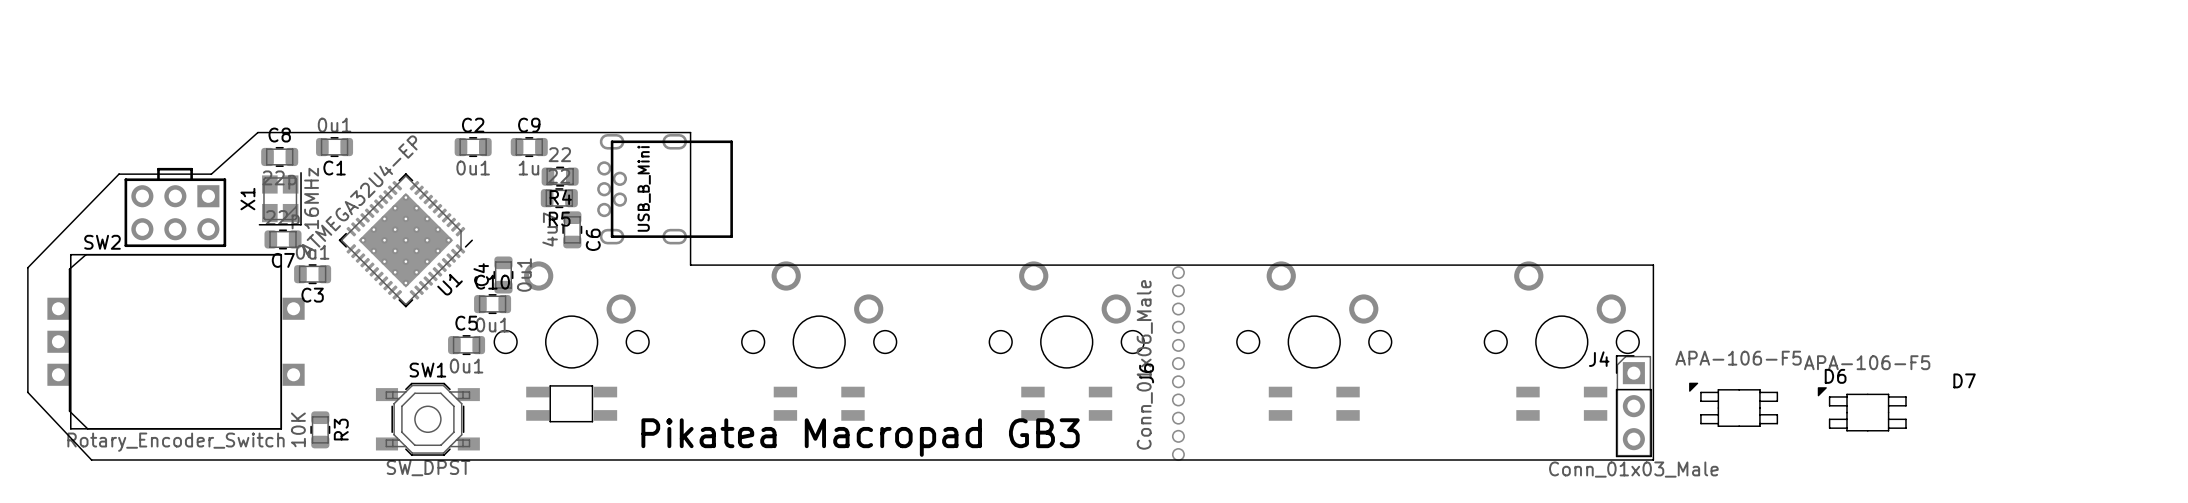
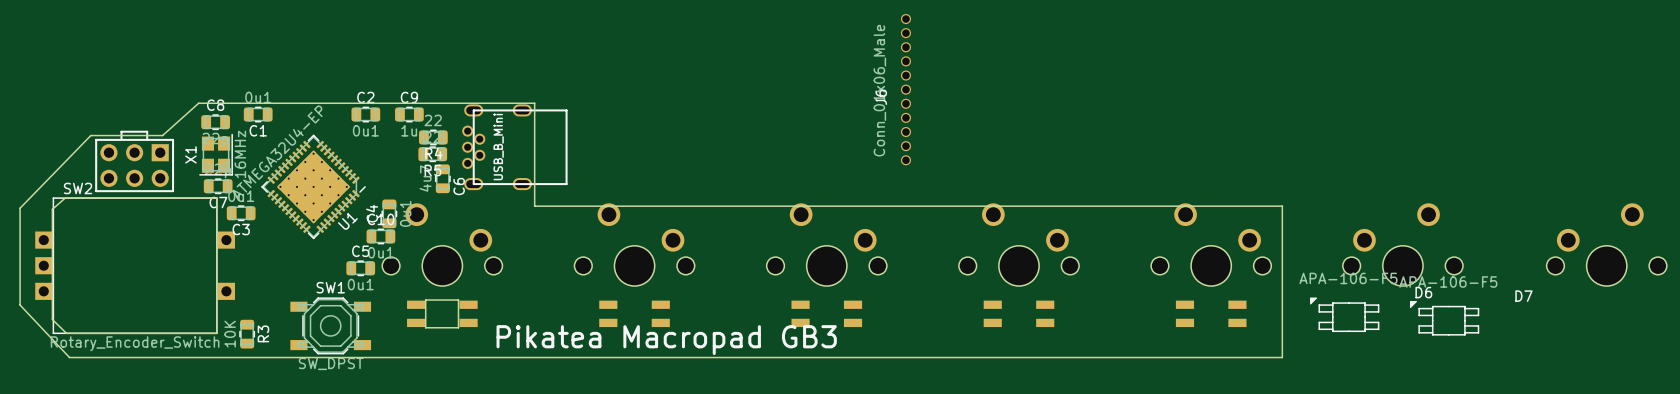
part: none -> (1402, 244)
part: none -> (1606, 244)
J6 position: (1178, 363) -> (905, 89)
J4: Conn_01x03_Male (1633, 406) -> none

